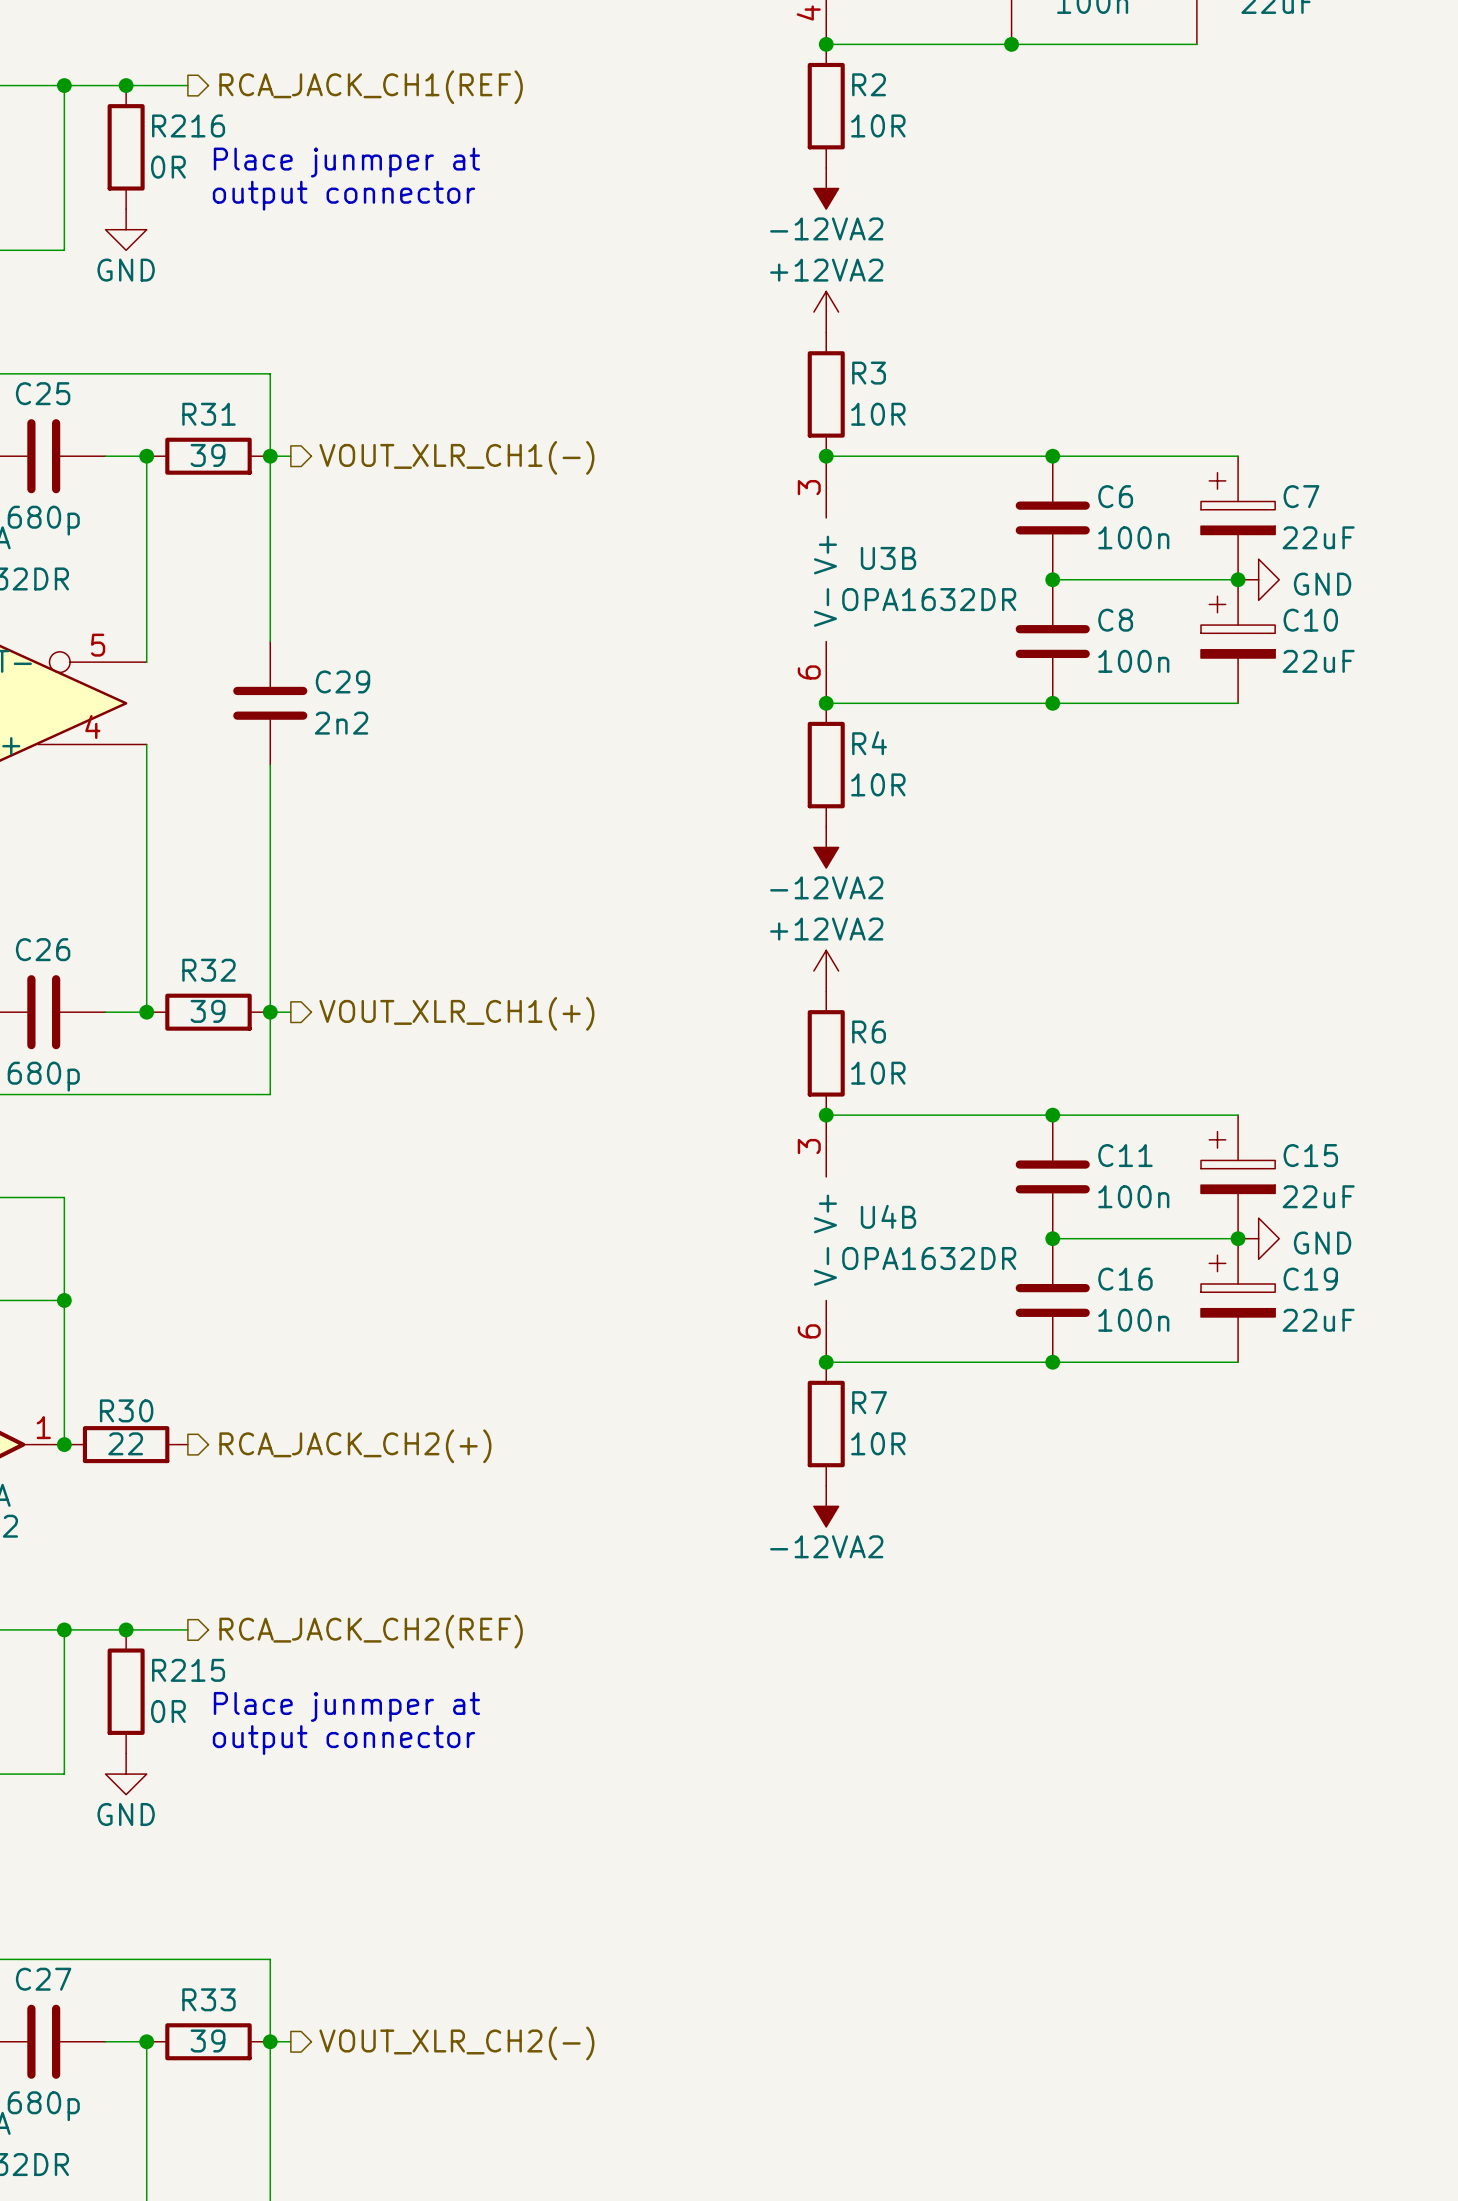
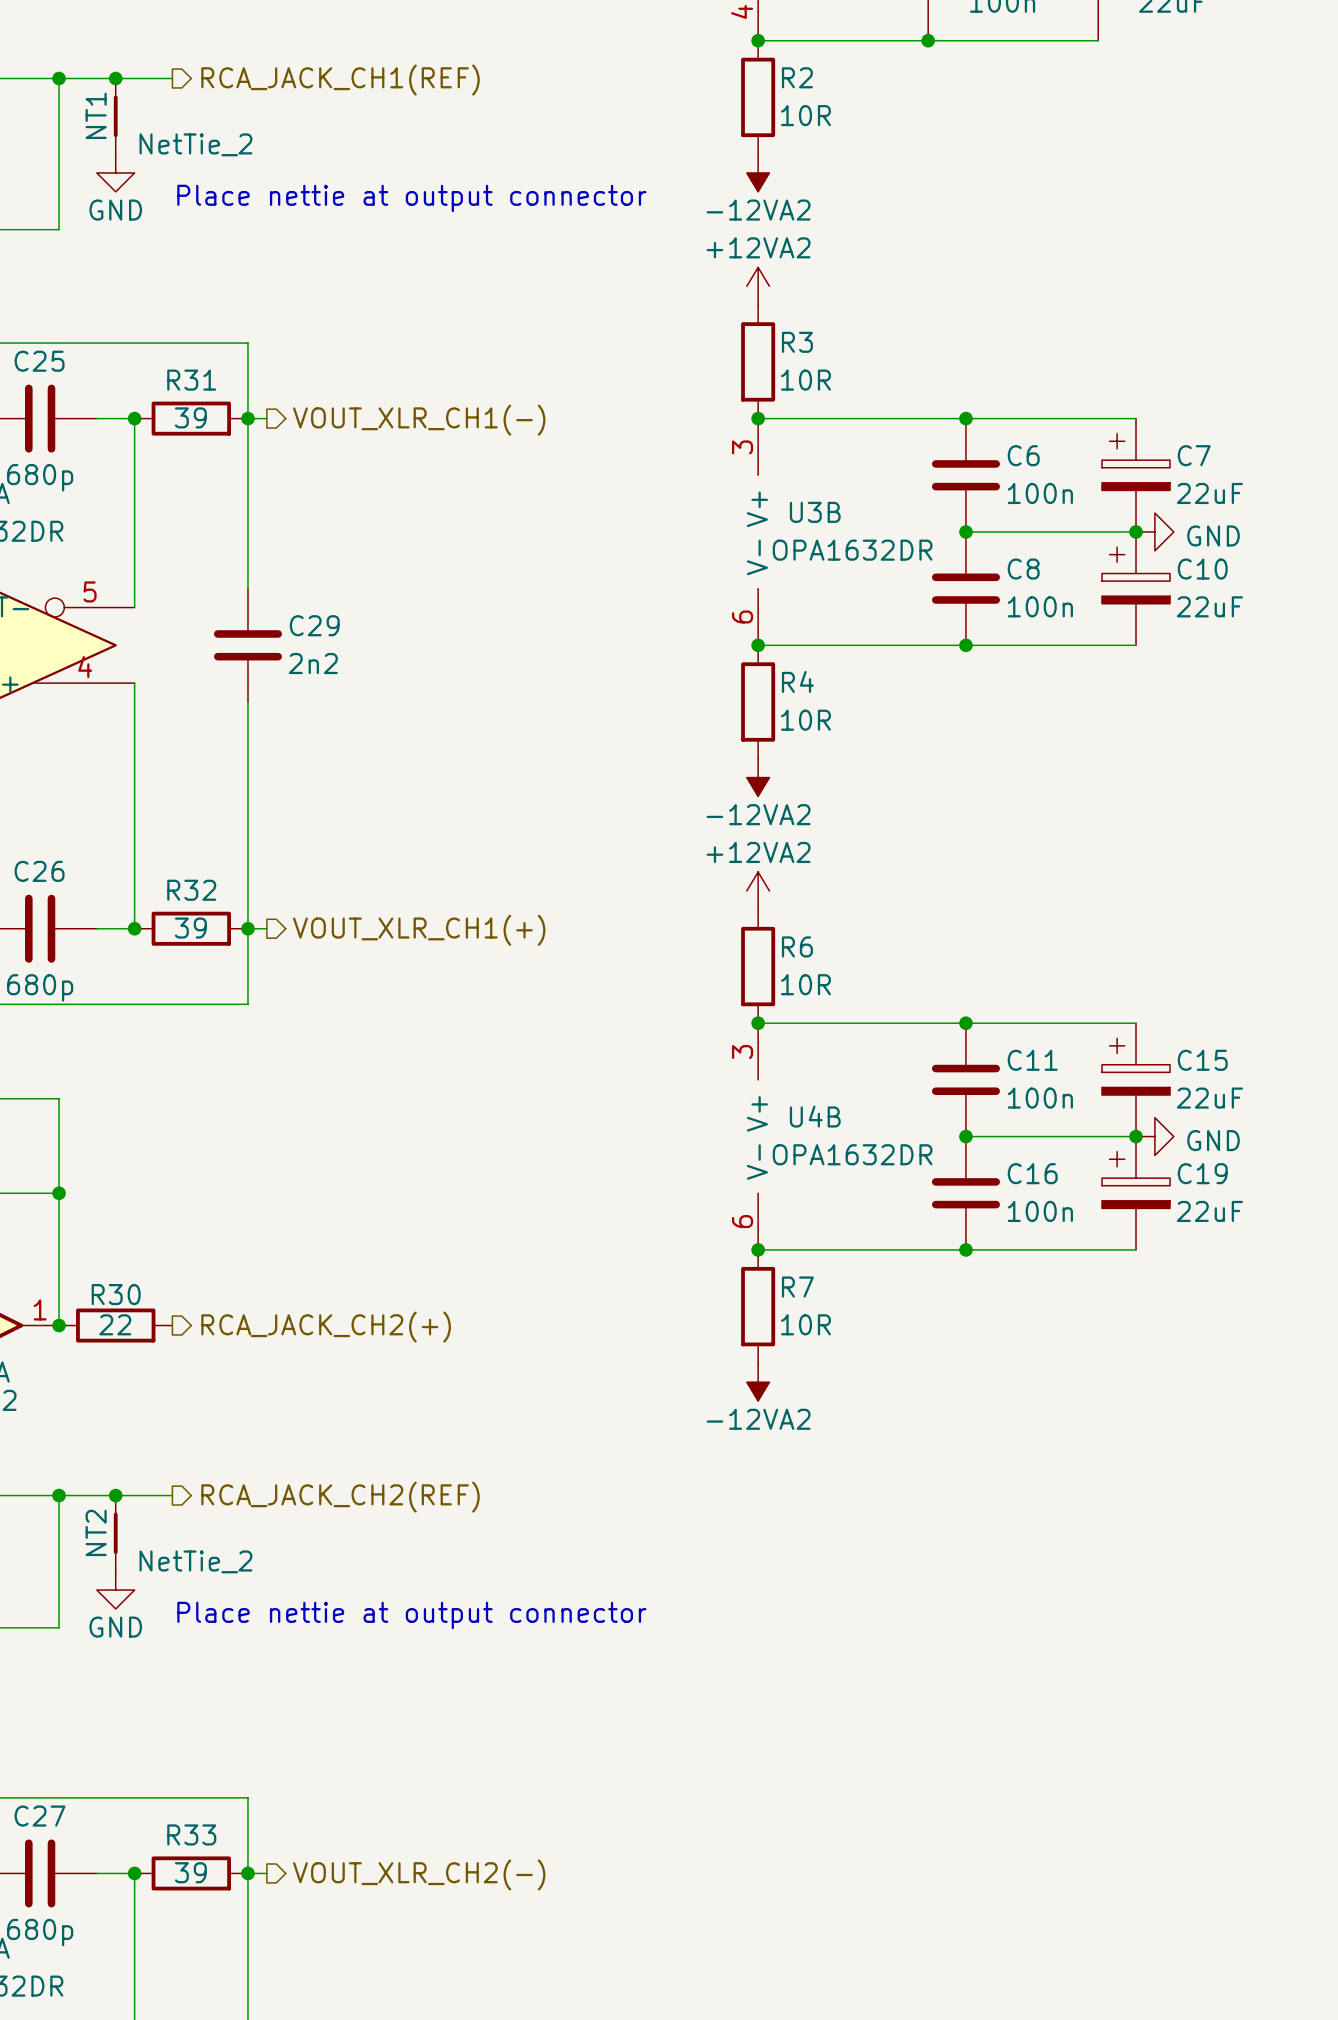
NT1: none -> NetTie_2 (115, 116)
R216: 0R (126, 147) -> none
text: Place junmper at (346, 162) -> none
text: output connector (343, 195) -> Place nettie at output connector (411, 198)
power symbol position: GND (126, 229) -> GND (115, 172)
NT2: none -> NetTie_2 (115, 1533)
R215: 0R (126, 1691) -> none
text: Place junmper at (346, 1706) -> none
text: output connector (343, 1740) -> Place nettie at output connector (411, 1615)
power symbol position: GND (126, 1774) -> GND (115, 1590)

